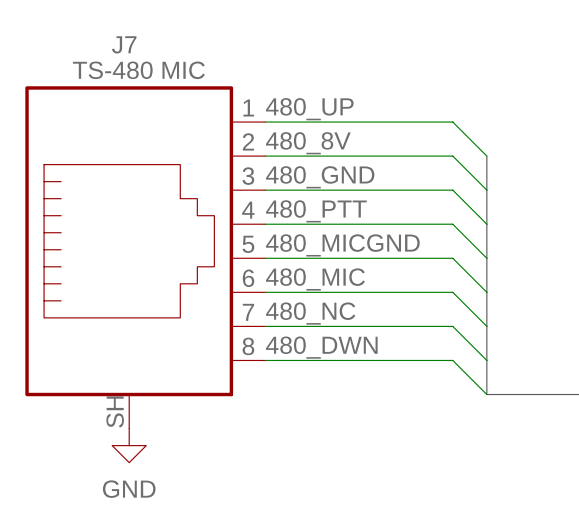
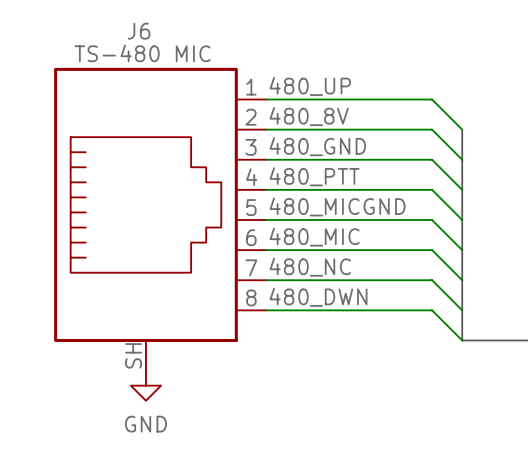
J7 name: J7 (124, 44) -> J6 (139, 31)

